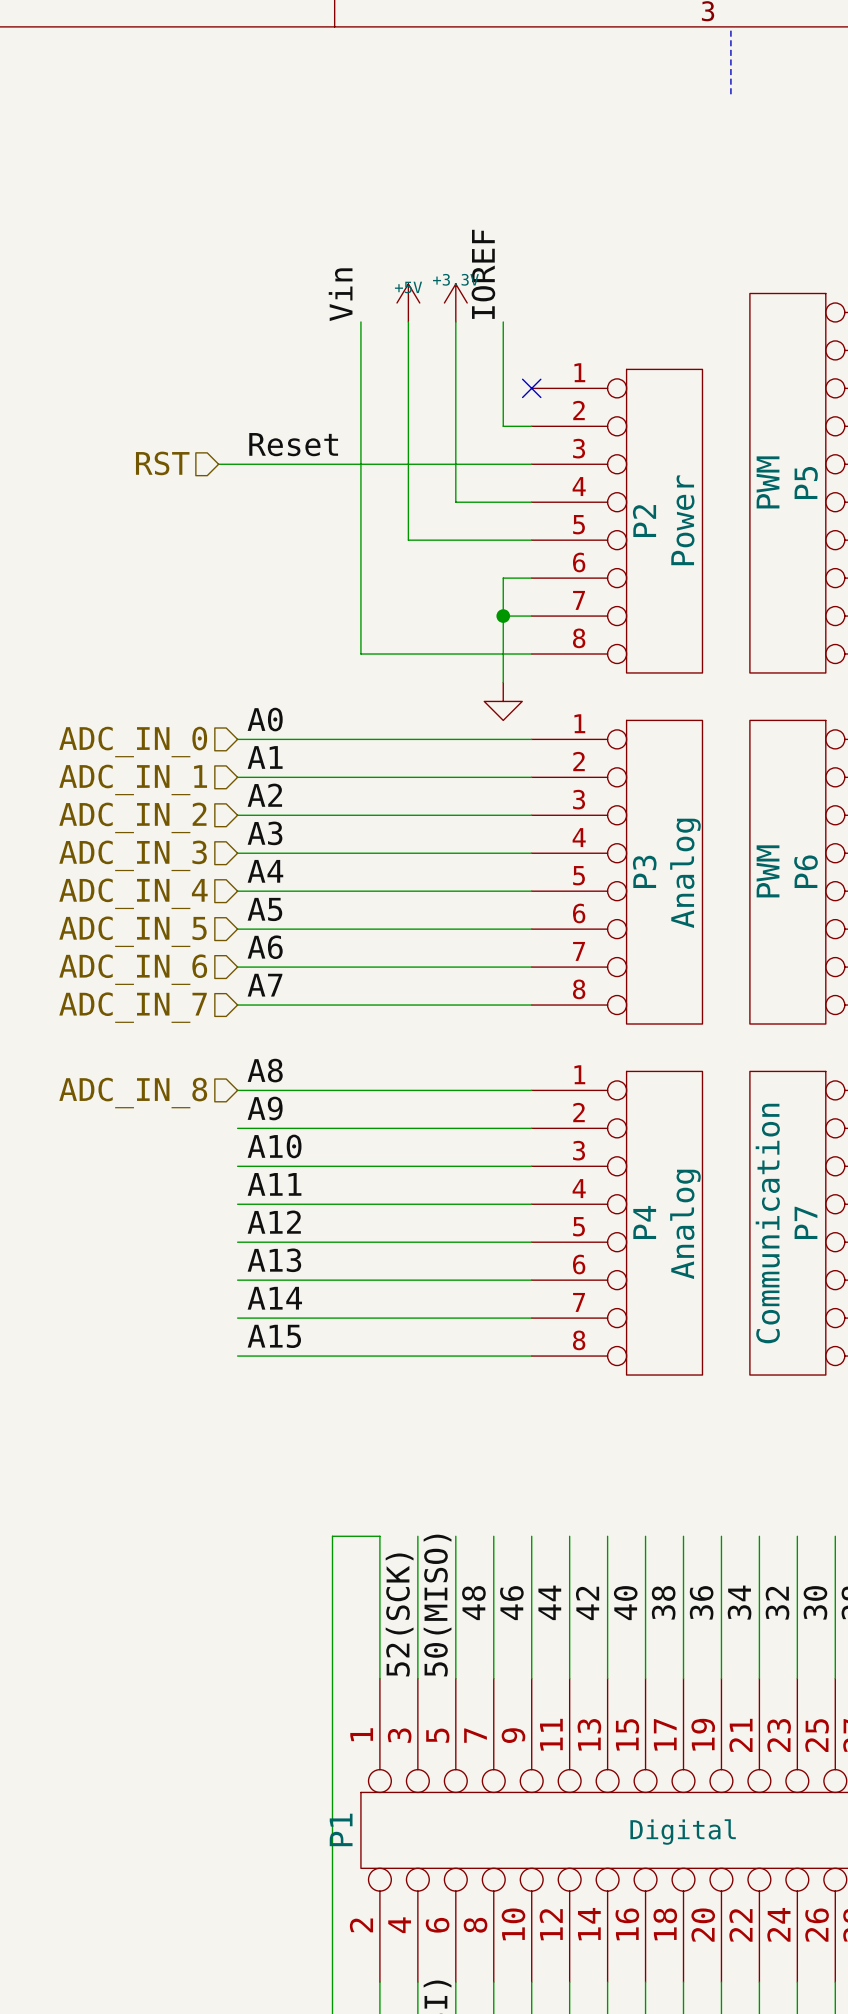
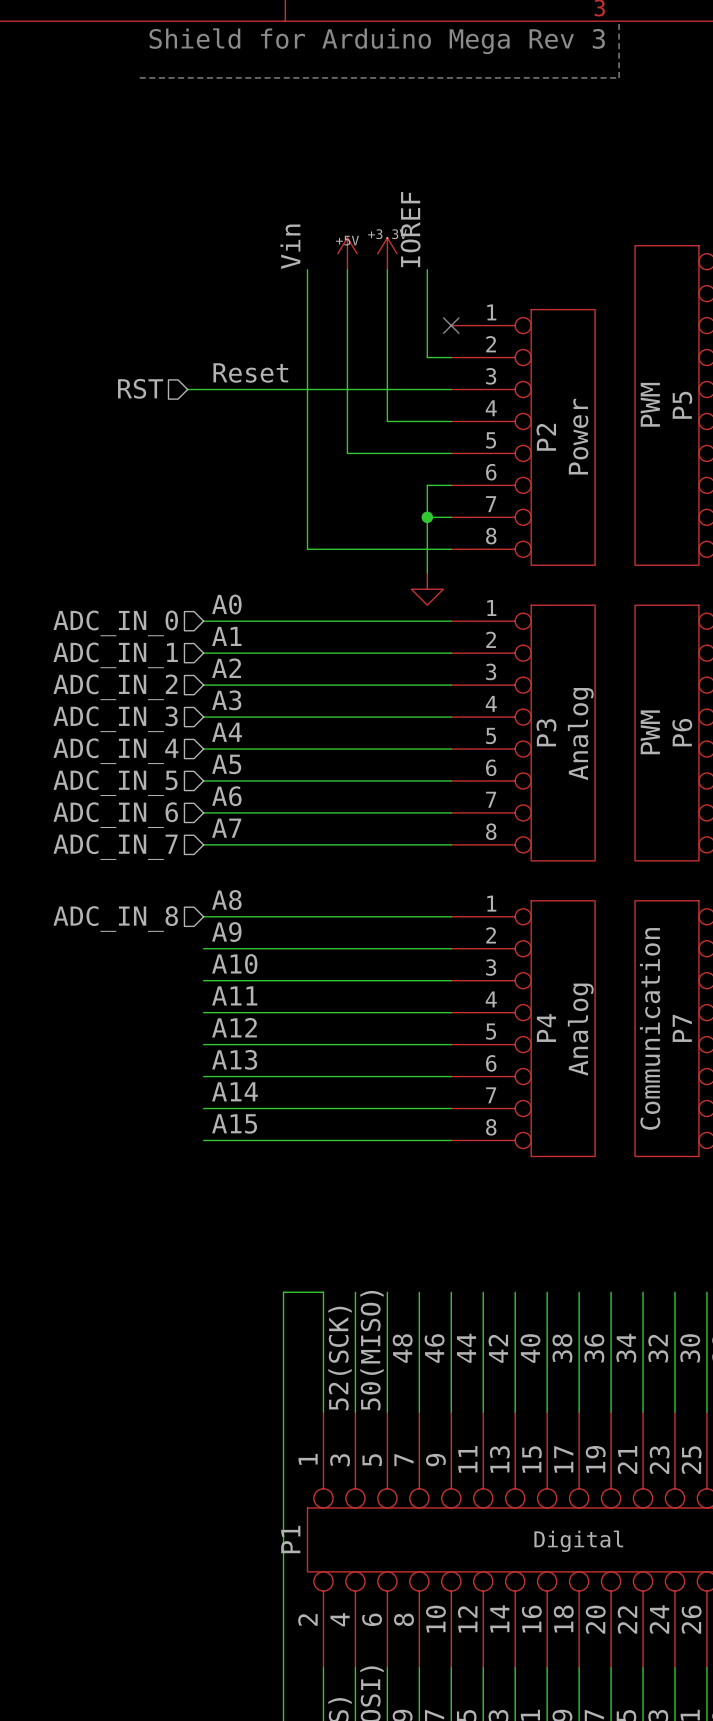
text: none -> Shield for Arduino Mega Rev 3 (377, 41)
line: none -> (139, 77) (619, 77)

